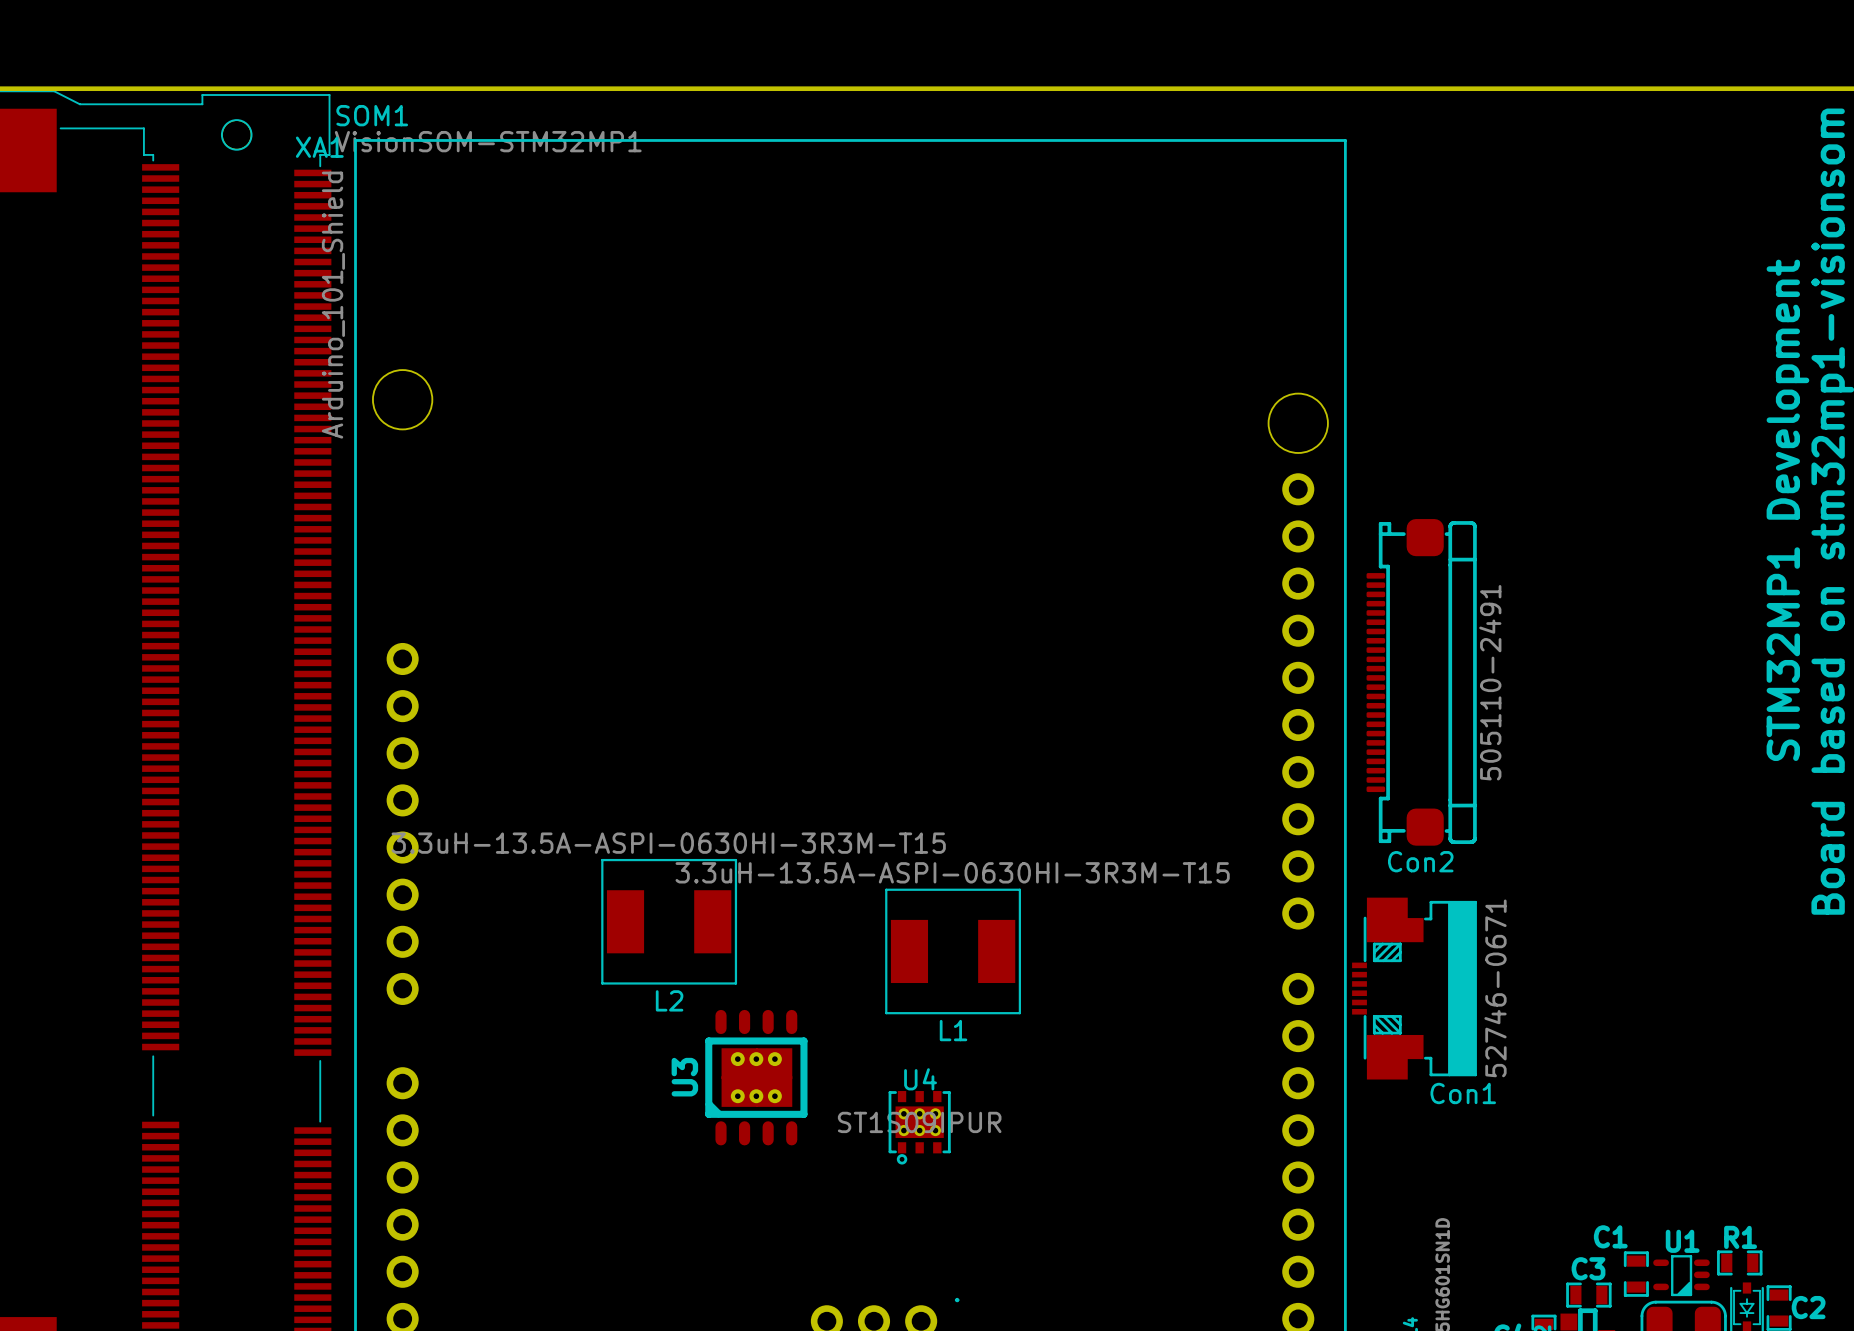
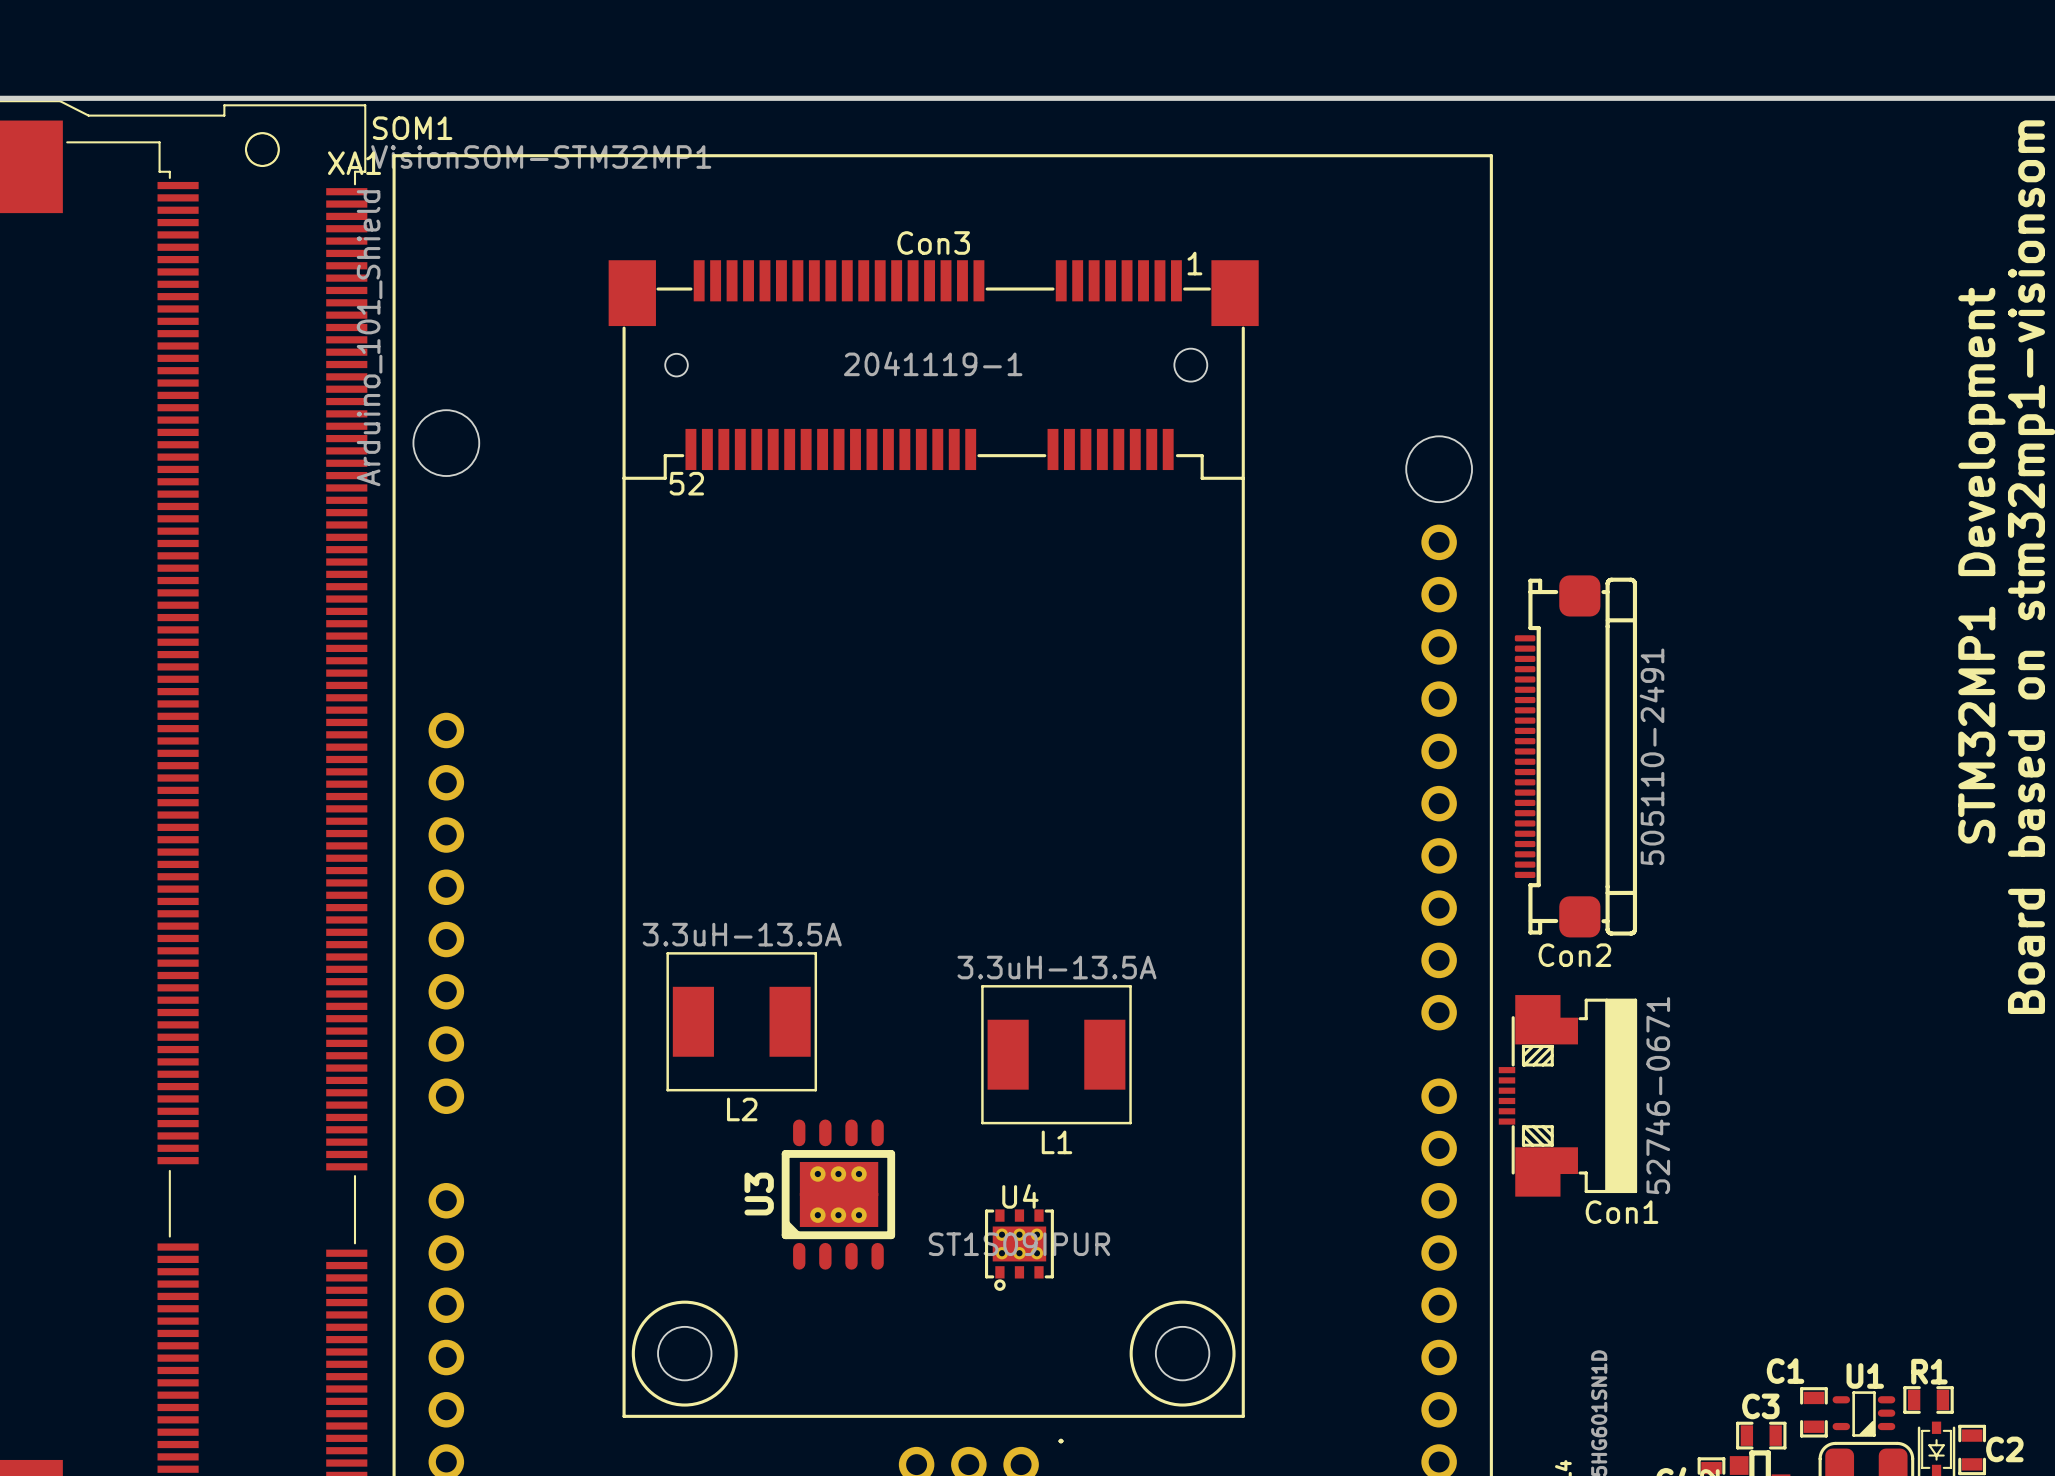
Con3: none -> 2041119-1 (933, 839)
L2 value: 3.3uH-13.5A-ASPI-0630HI-3R3M-T15 (668, 843) -> 3.3uH-13.5A (742, 934)
L1 value: 3.3uH-13.5A-ASPI-0630HI-3R3M-T15 (952, 872) -> 3.3uH-13.5A (1056, 967)

